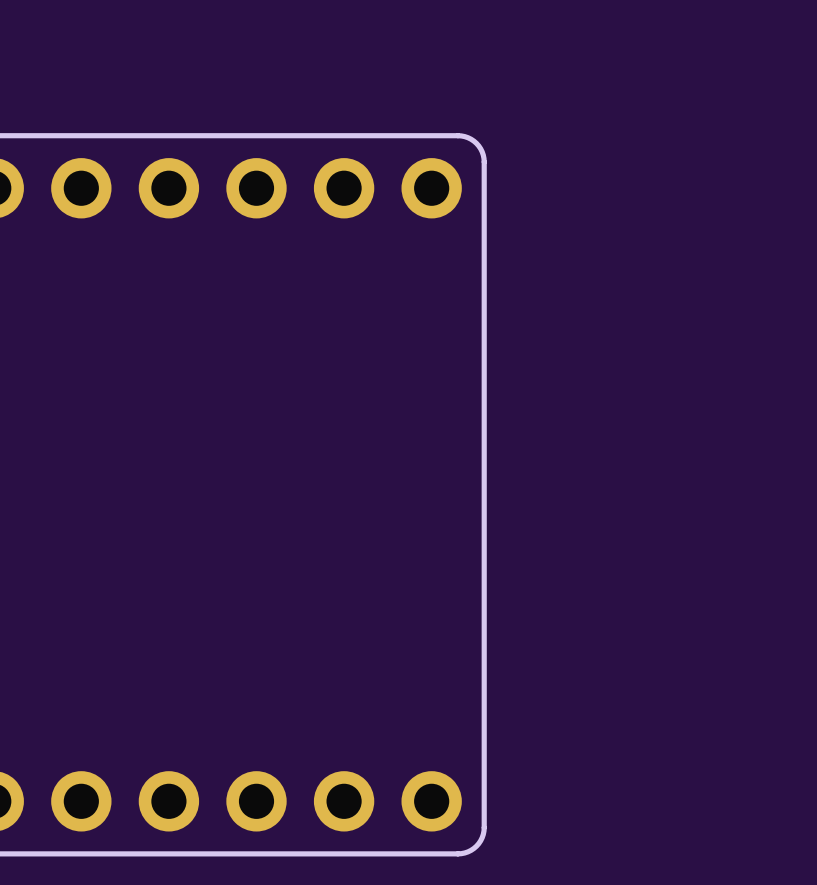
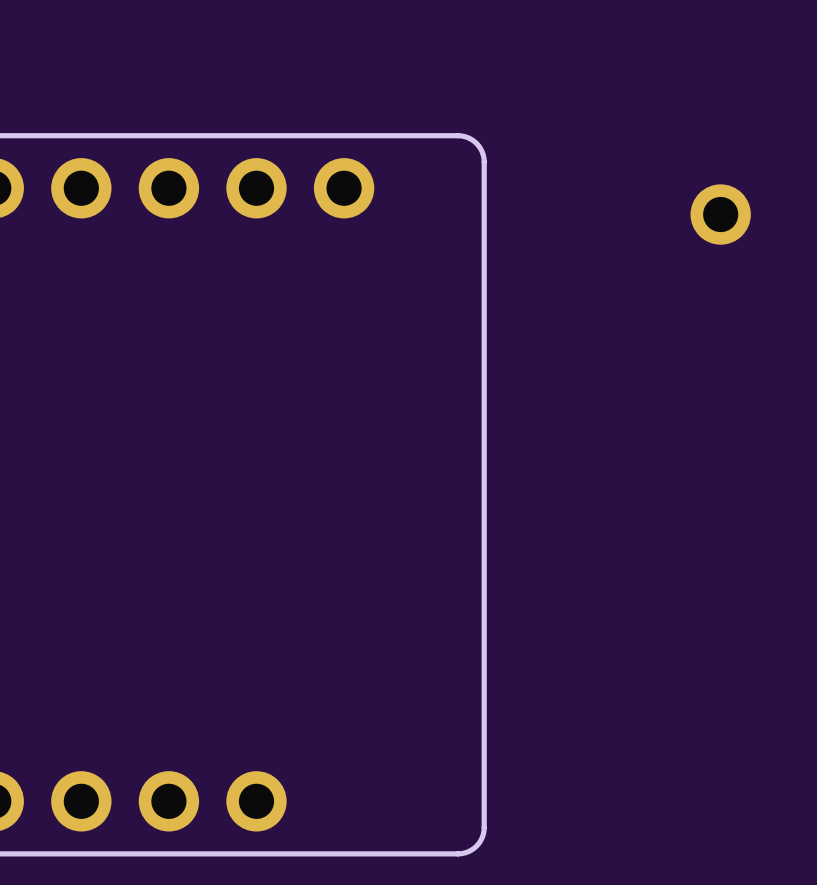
part: (431, 188) -> none
part: none -> (720, 214)
part: (344, 801) -> none
part: (431, 801) -> none

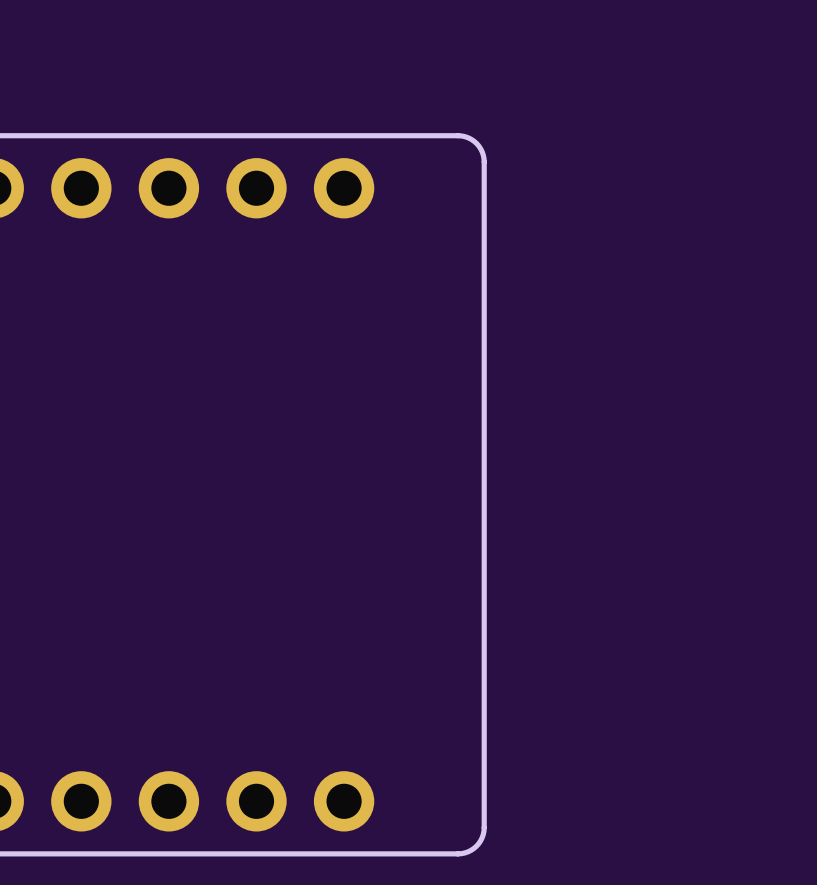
part: (720, 214) -> none
part: none -> (344, 801)

